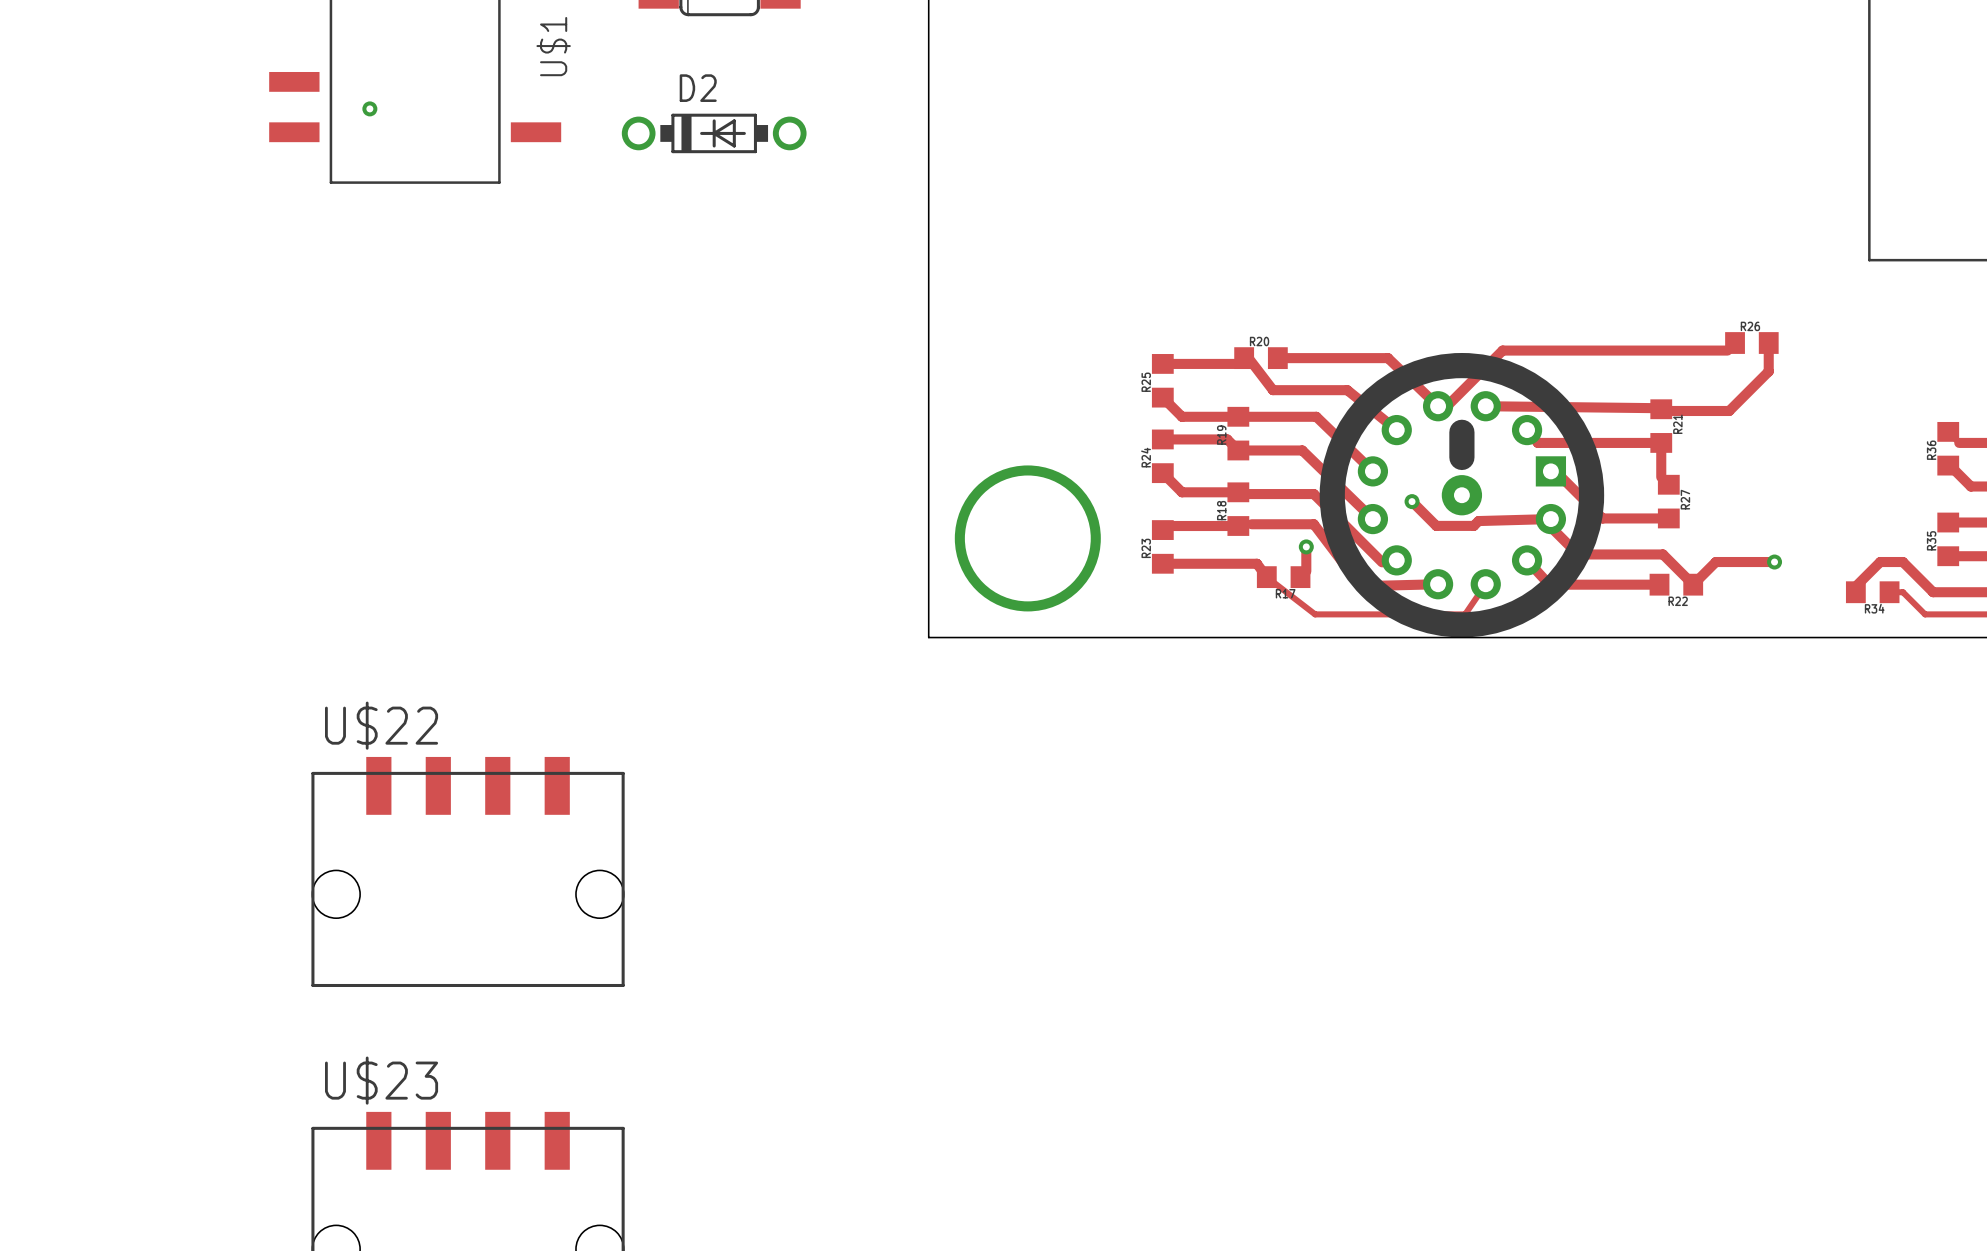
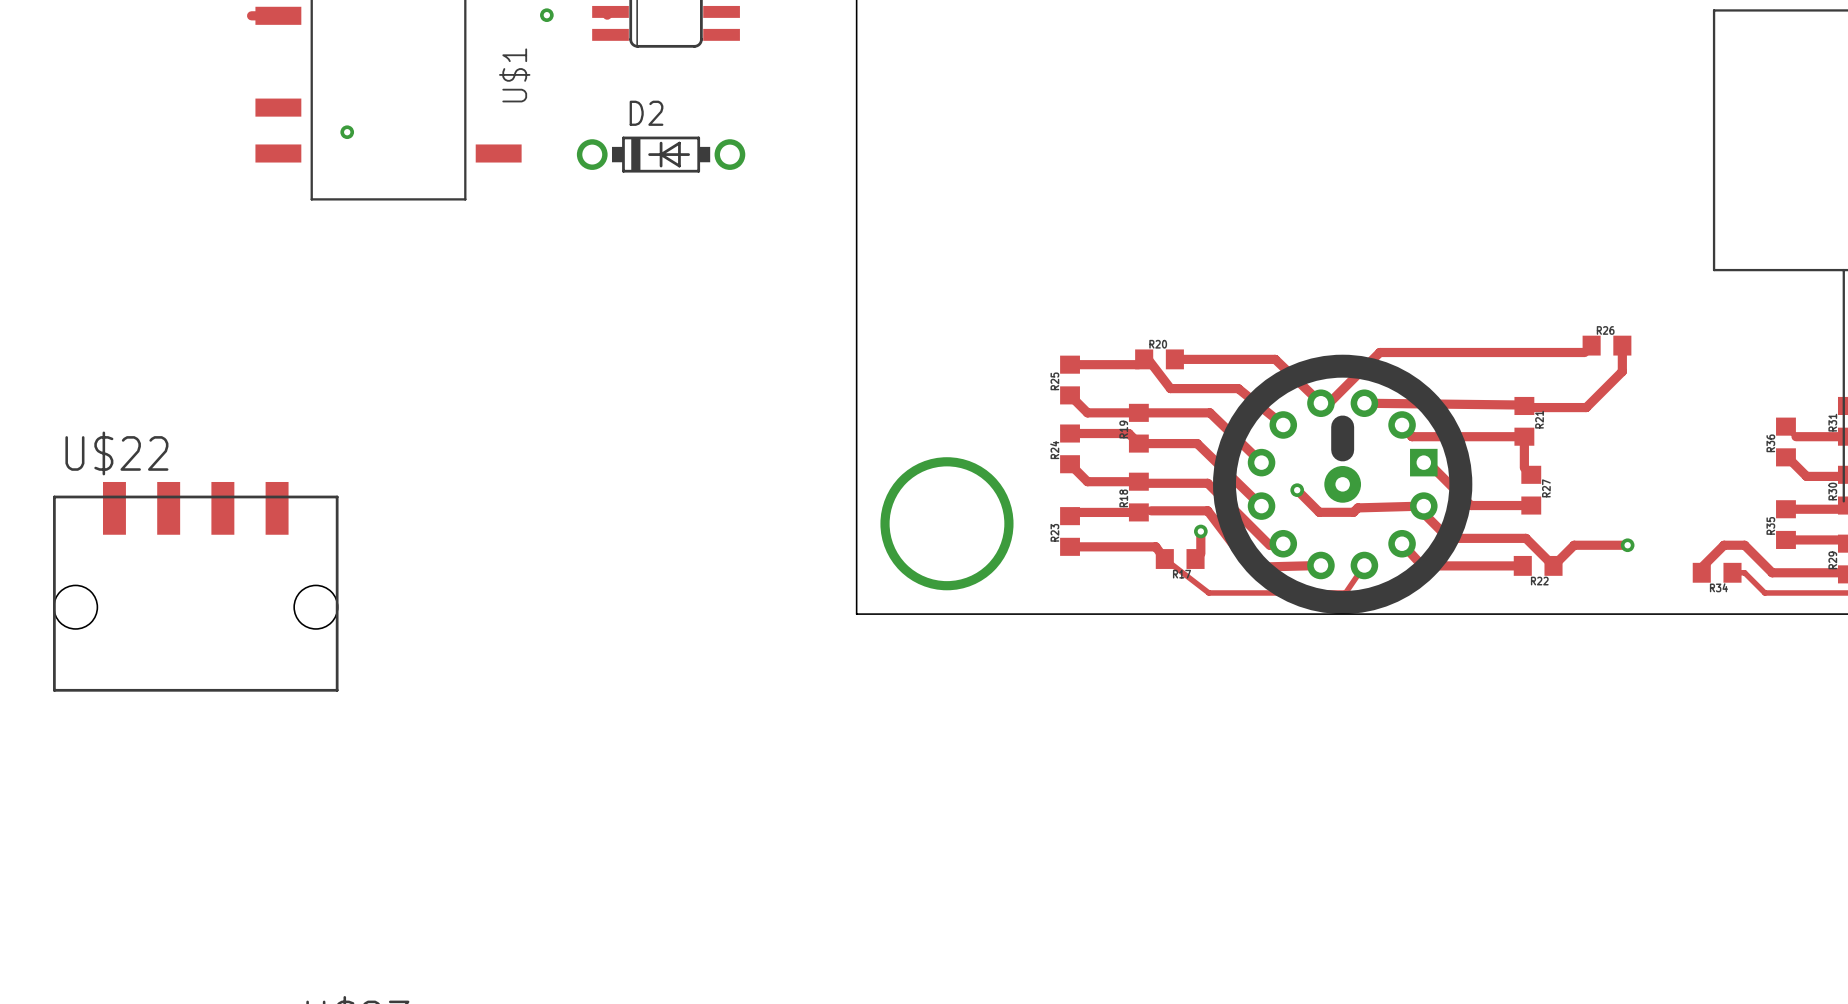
U$22 position: (468, 871) -> (195, 586)

